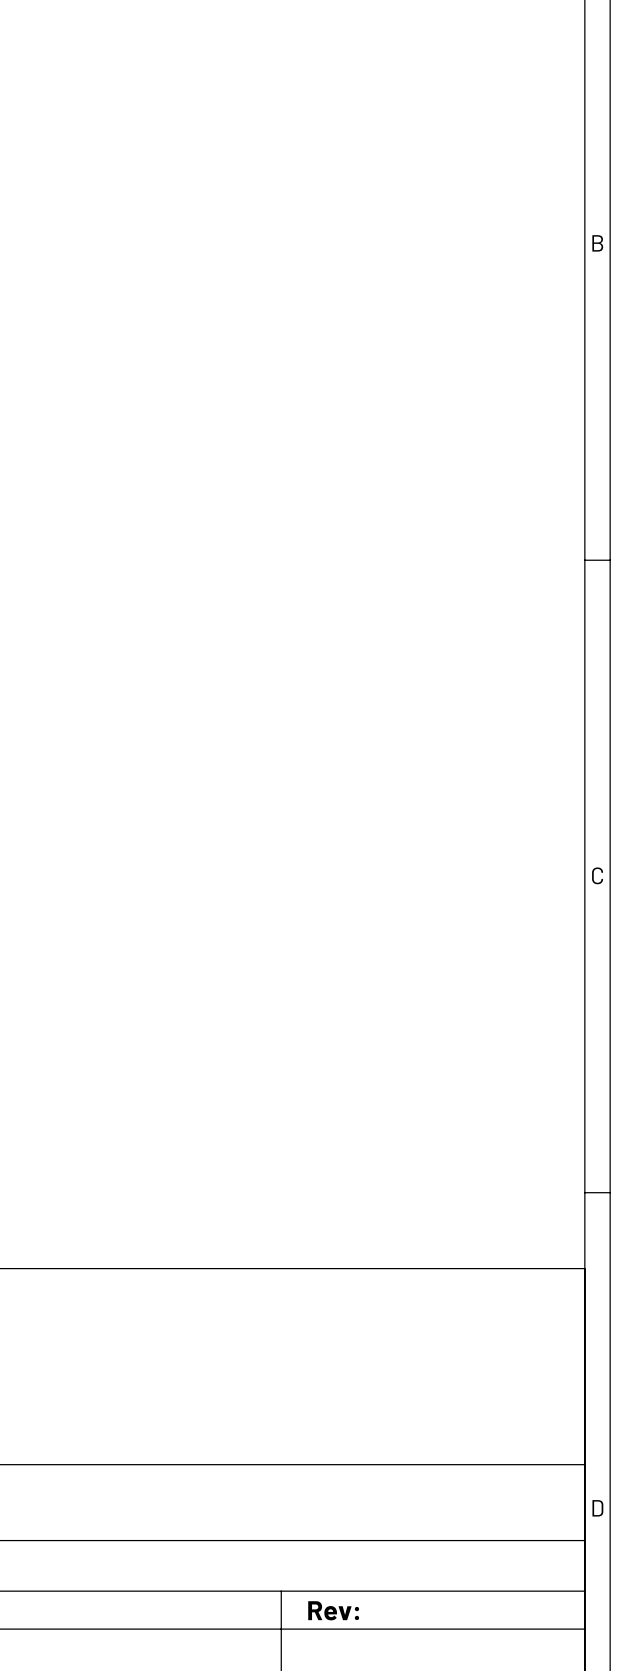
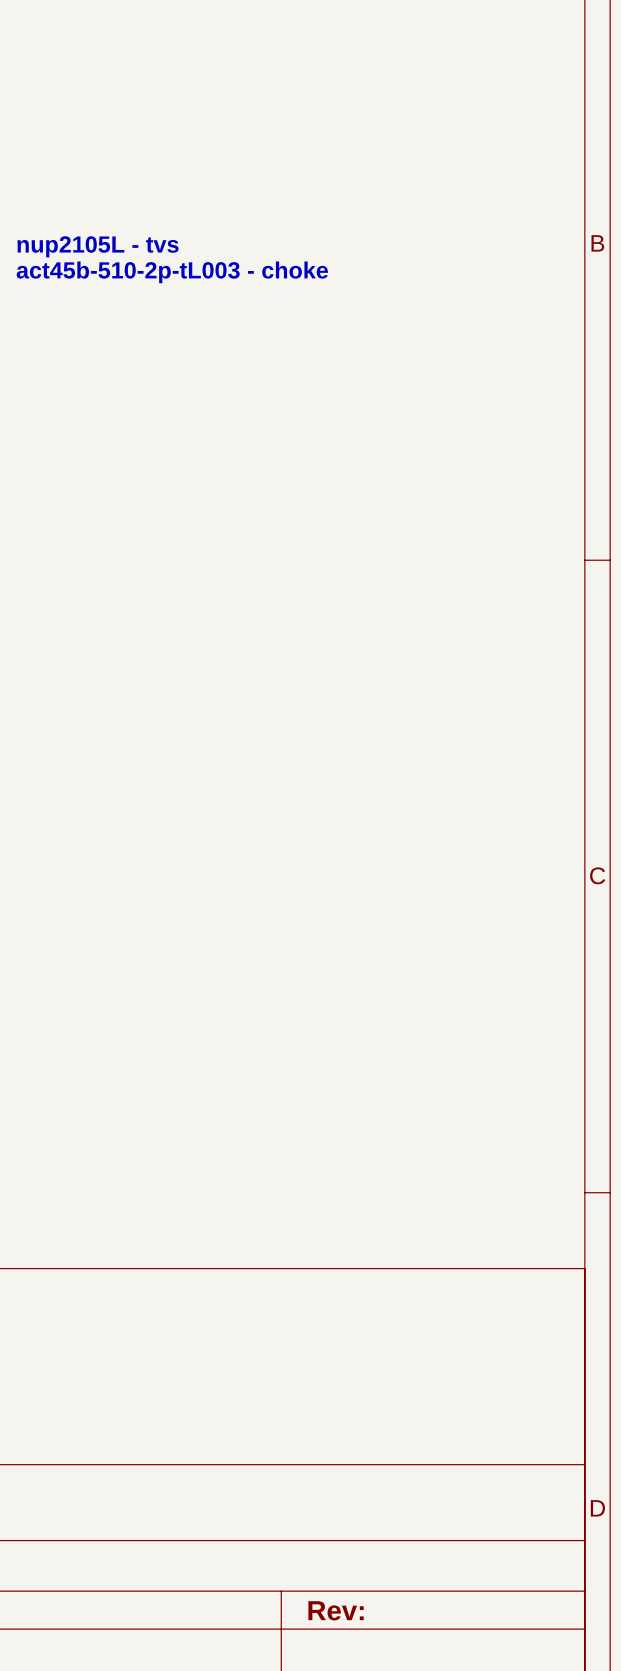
text: none -> nup2105L - tvs (98, 246)
text: none -> act45b-510-2p-tL003 - choke (172, 272)

